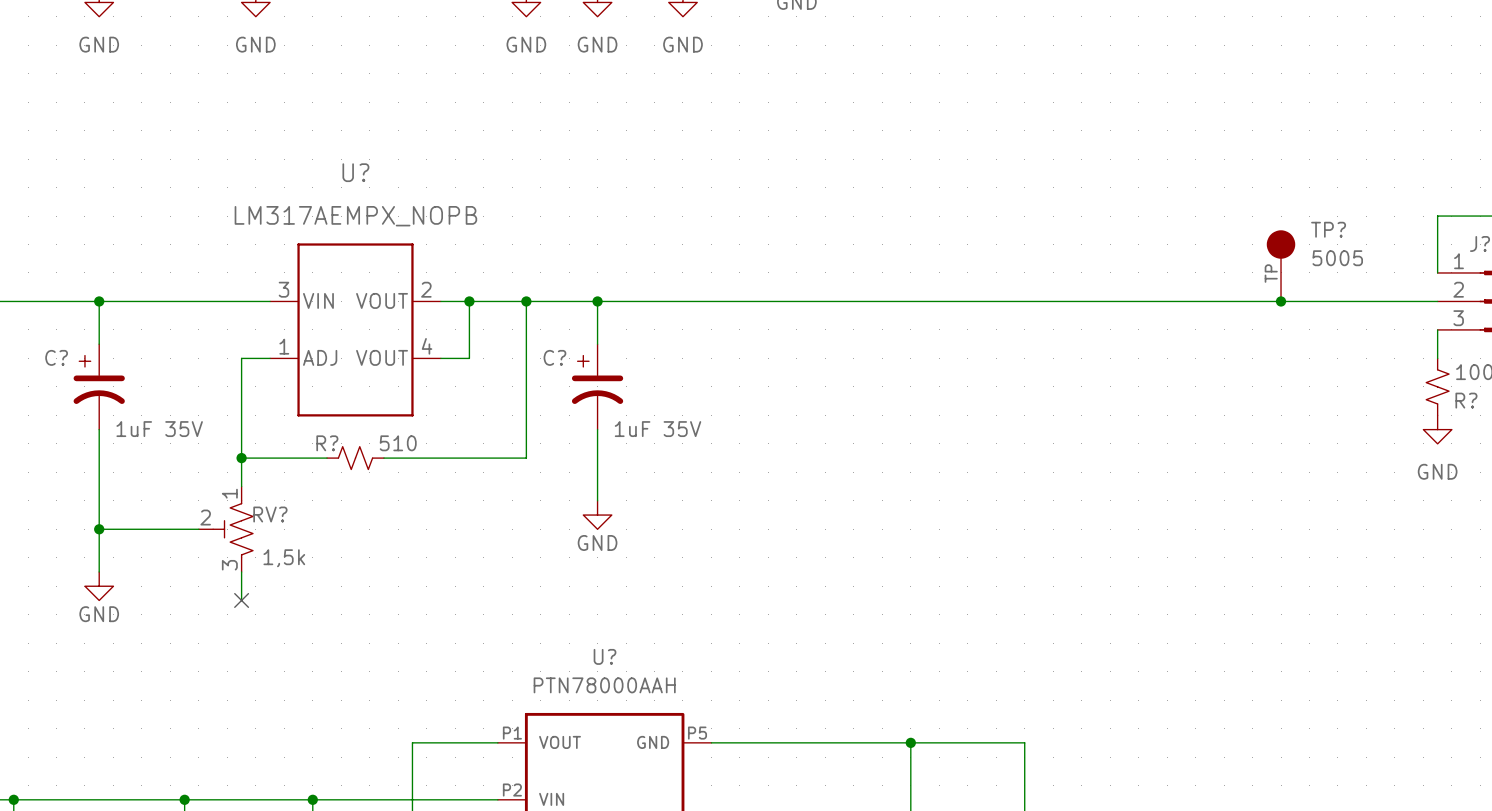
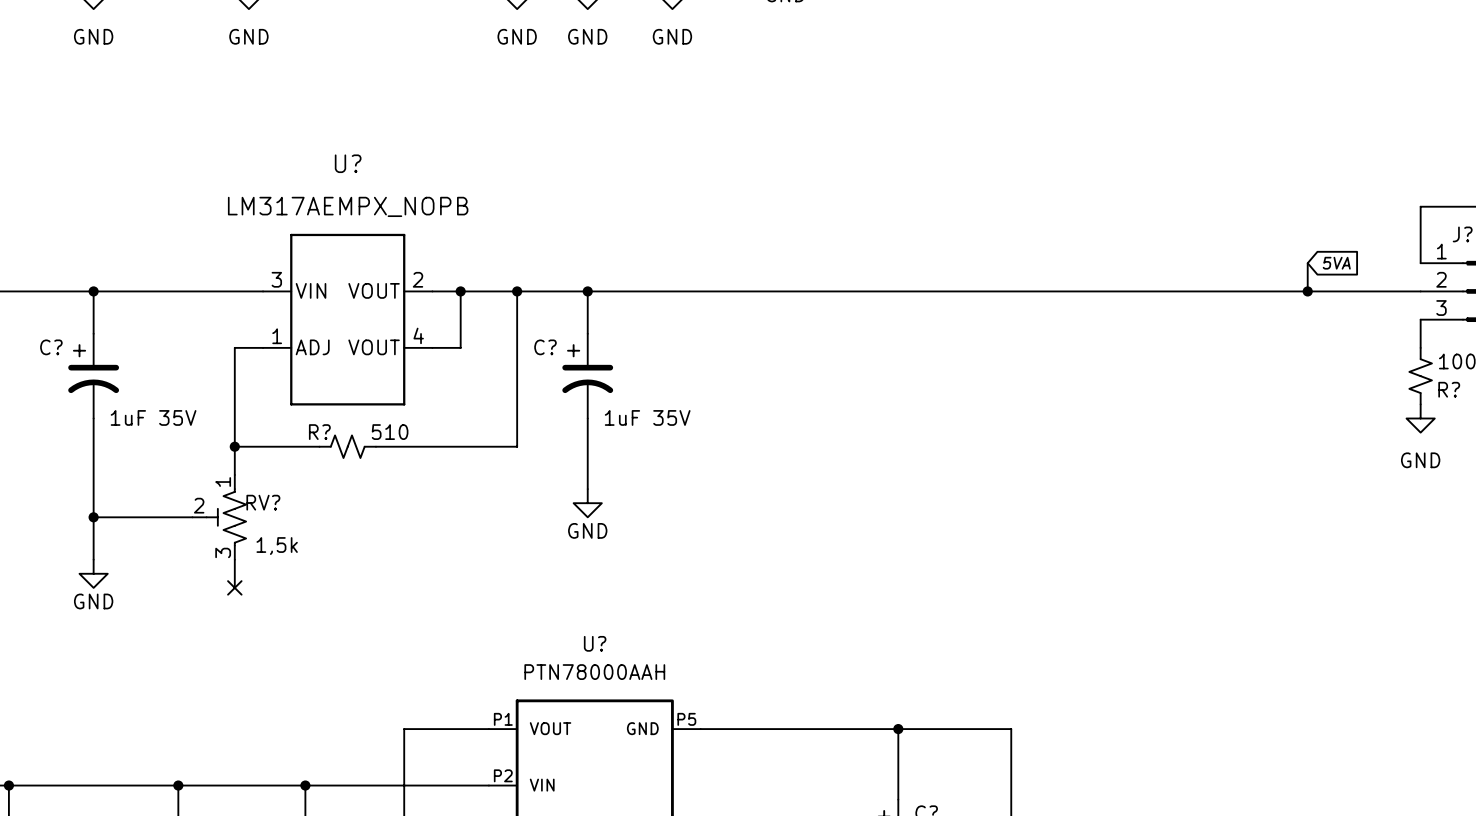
TP?: 5005 (1281, 265) -> none
wire: none -> (1307, 263) (1307, 291)
global label: none -> 5VA (1336, 263)
junction position: (1281, 301) -> (1307, 291)

